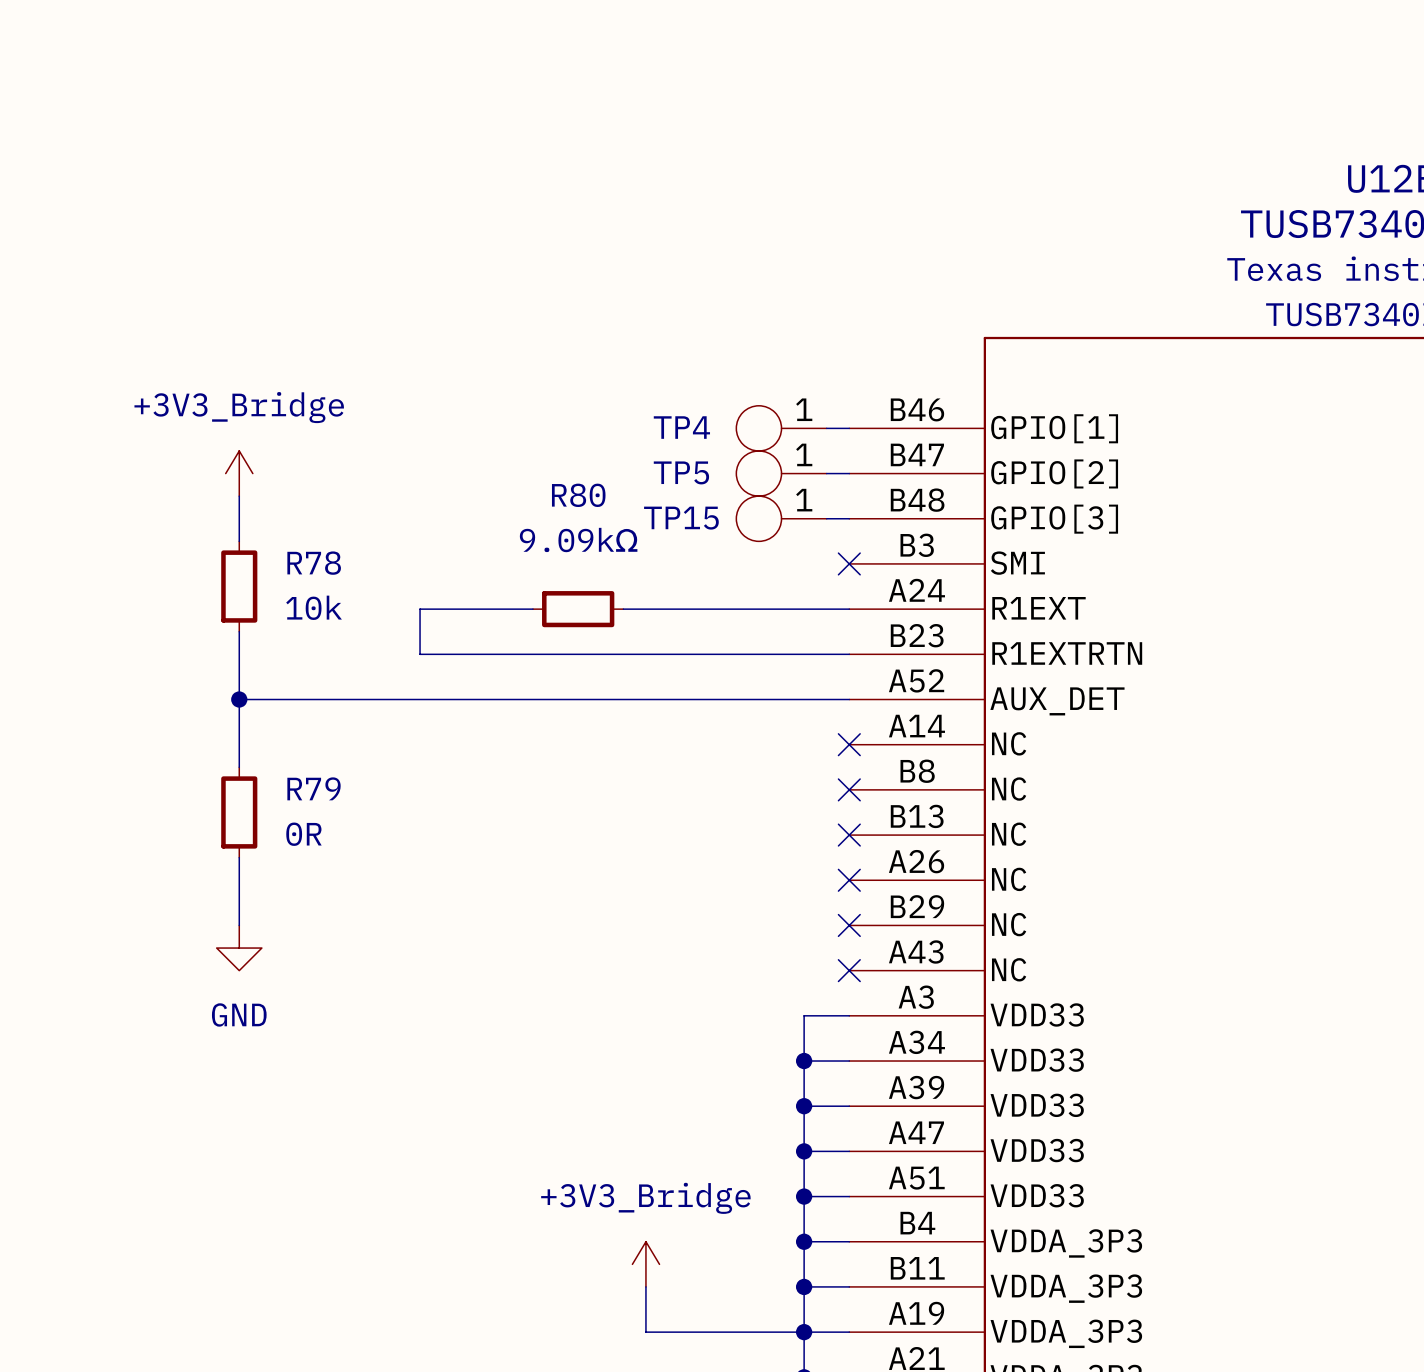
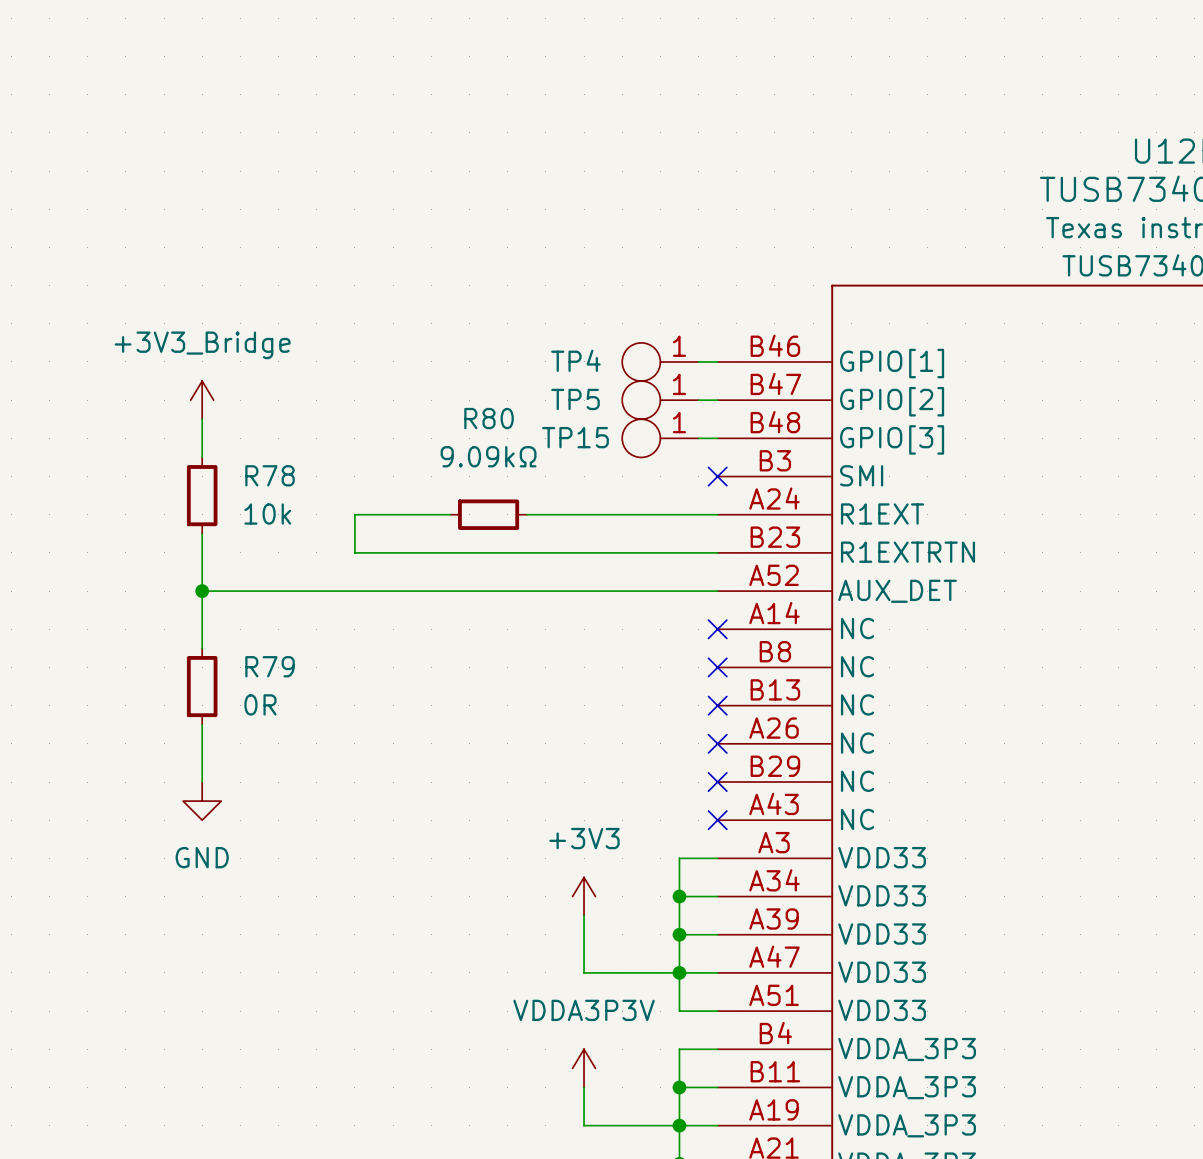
power symbol: none -> +3V3 (584, 896)
wire: none -> (584, 915) (584, 972) (679, 972)
wire: (804, 1196) (804, 1241) -> none
junction: (804, 1196) -> none
junction: (804, 1241) -> none
power symbol: +3V3_Bridge (645, 1264) -> none
power symbol: none -> VDDA3P3V (584, 1068)
wire: (645, 1286) (645, 1332) (691, 1332) -> (584, 1087) (584, 1125)

